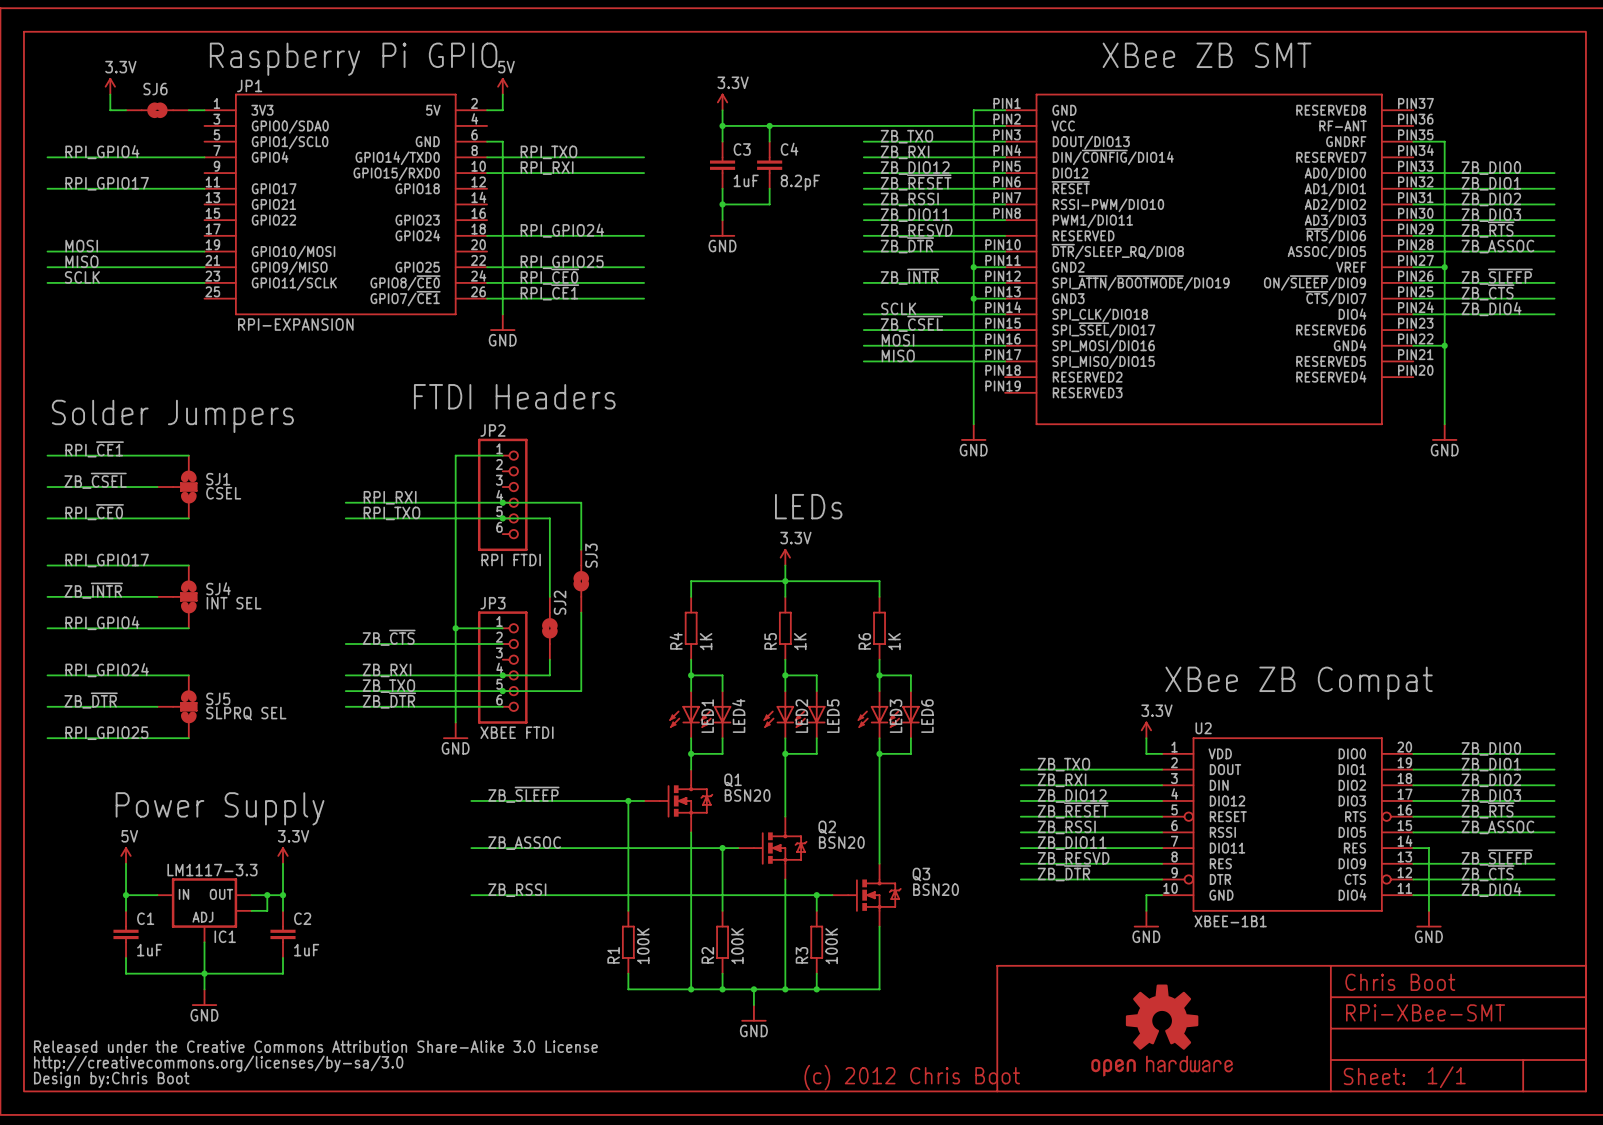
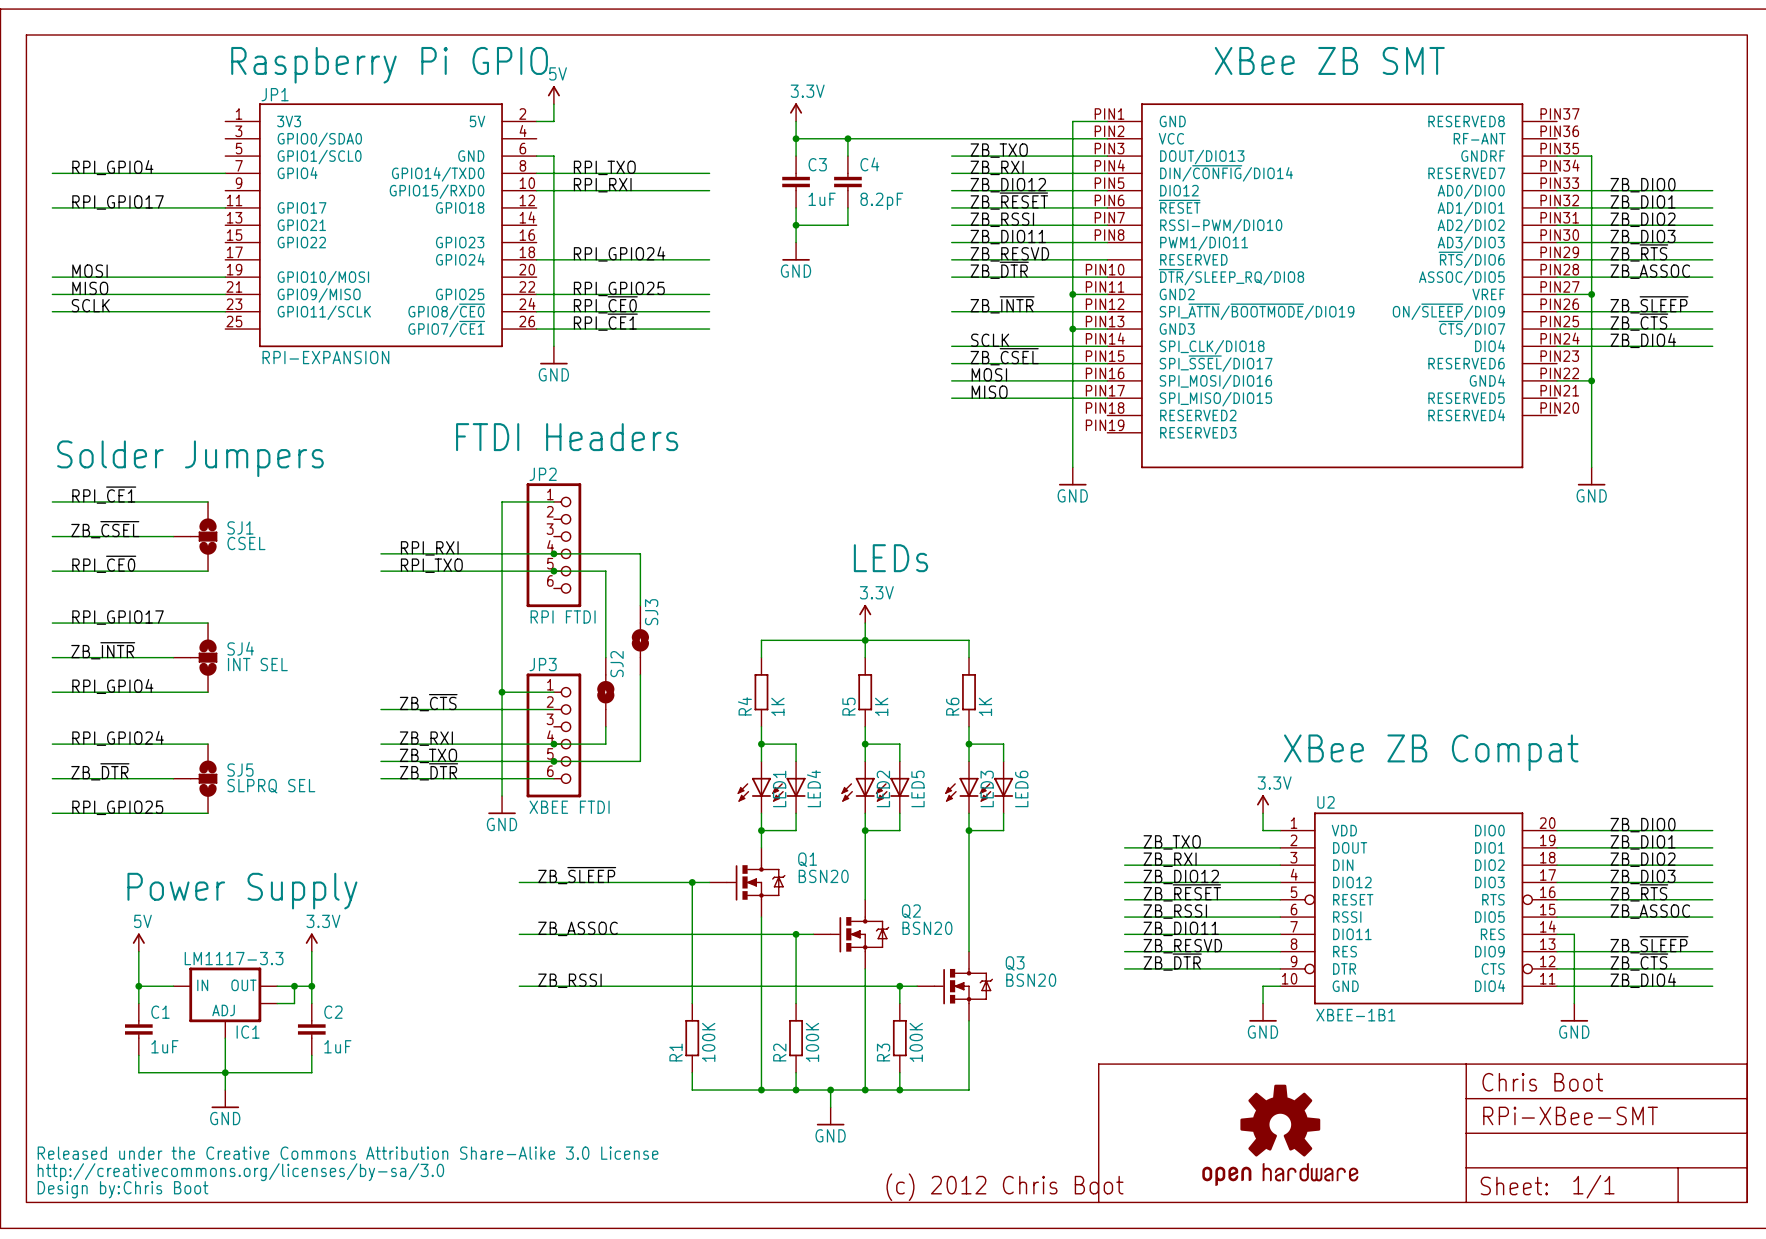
power symbol: 3.3V (110, 86) -> none
wire: (110, 94) (110, 110) (126, 110) -> none
SJ6: (157, 110) -> none
wire: (188, 110) (204, 110) -> none

